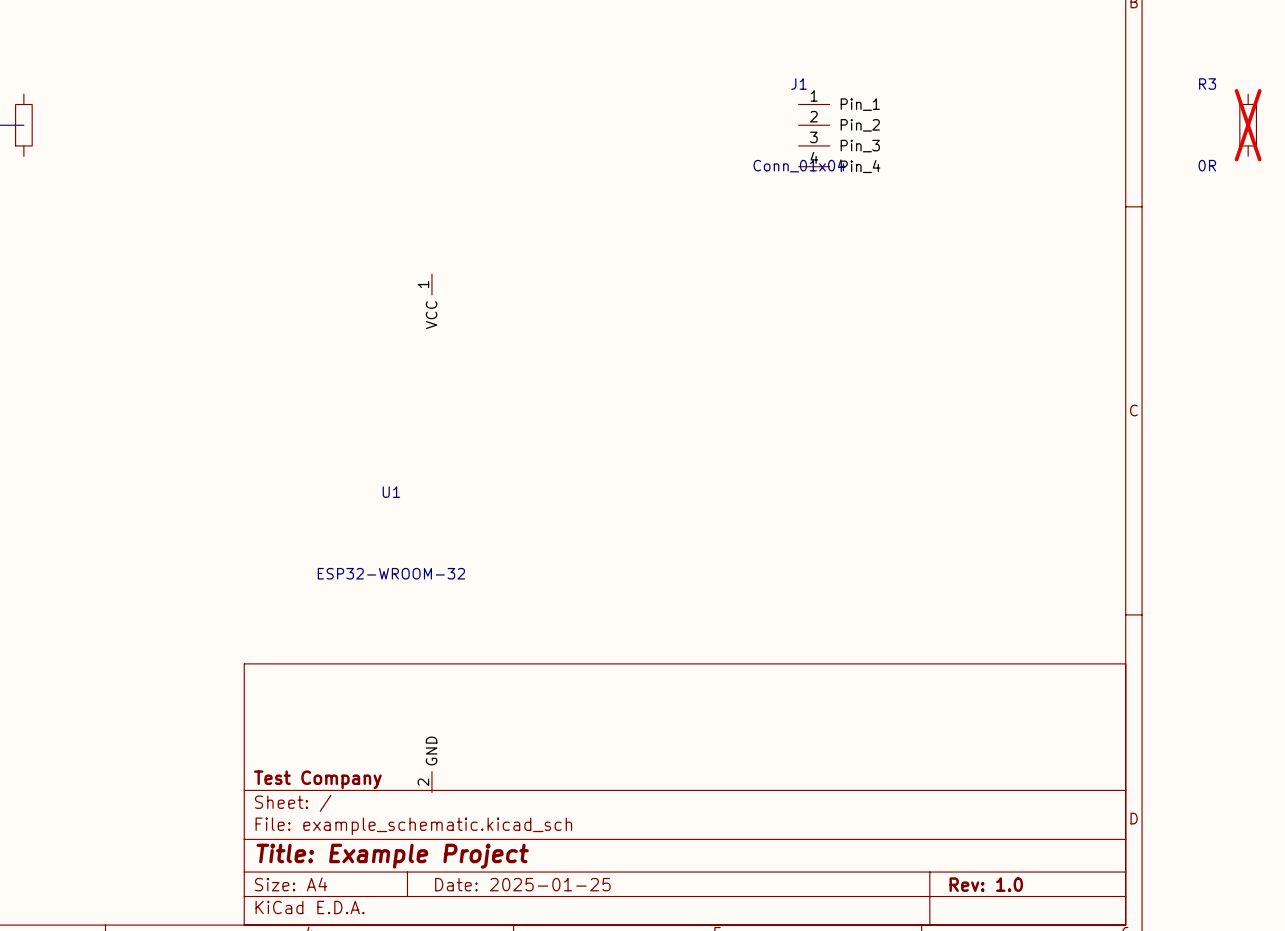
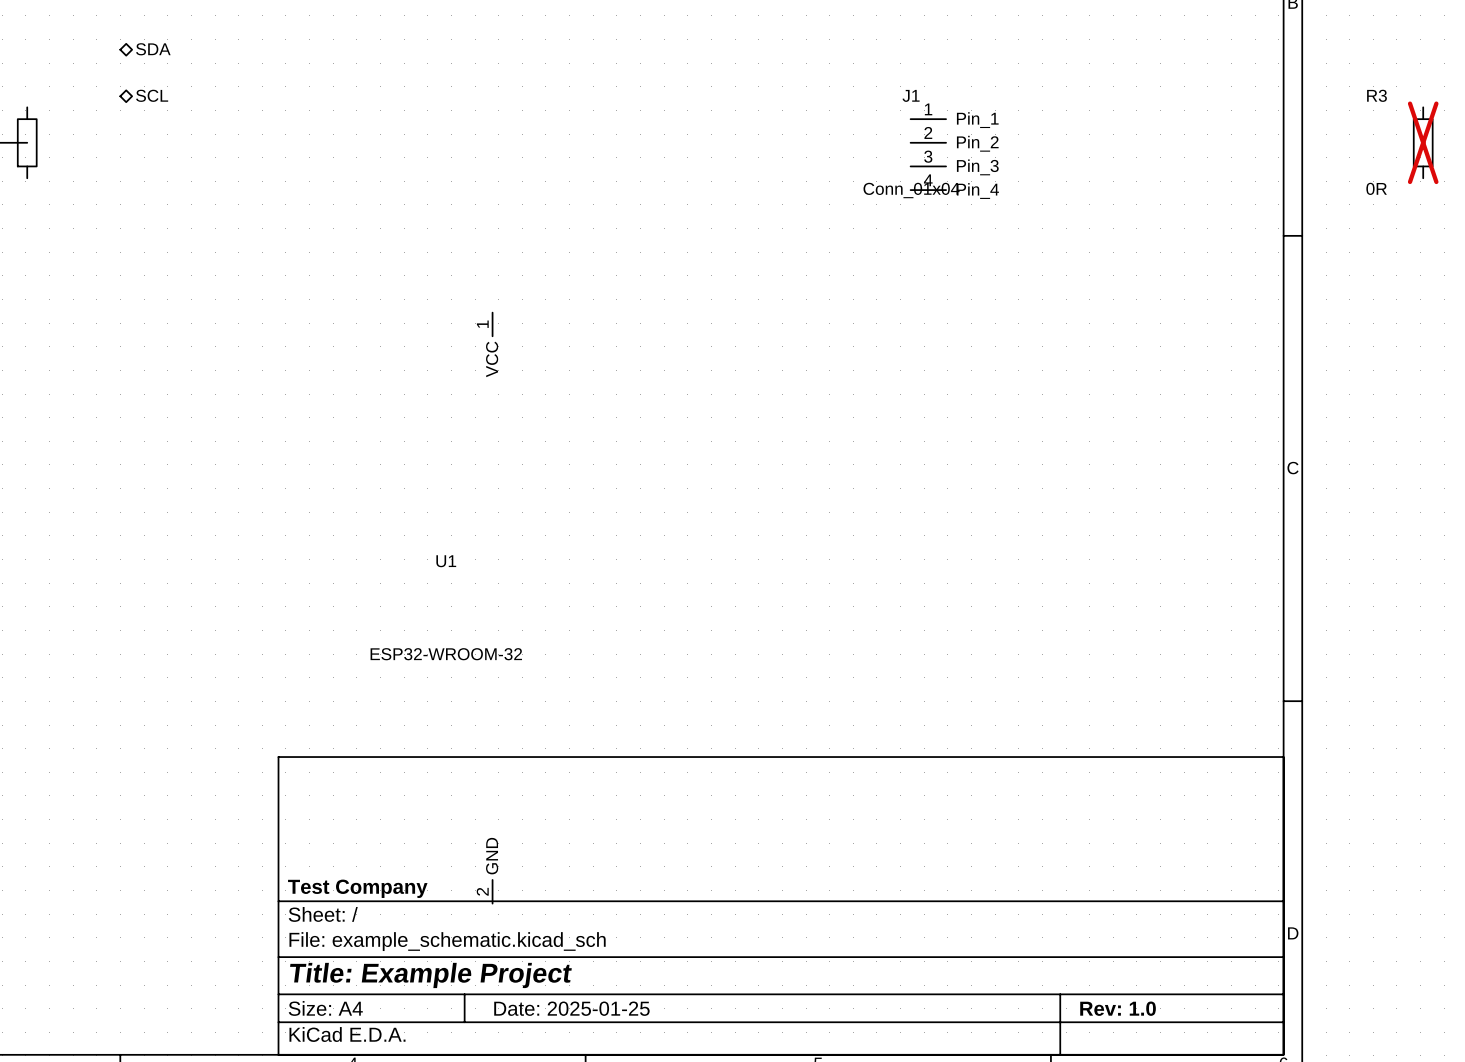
hierarchical label: none -> SDA (153, 49)
hierarchical label: none -> SCL (152, 95)

